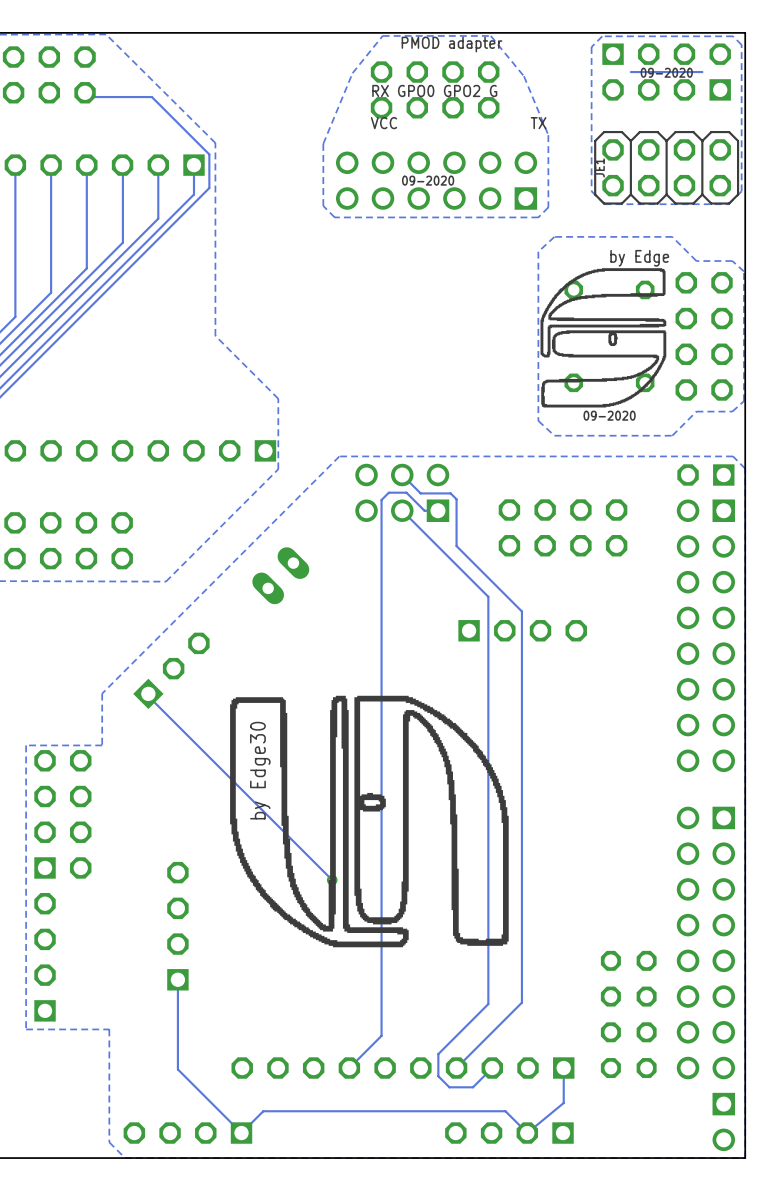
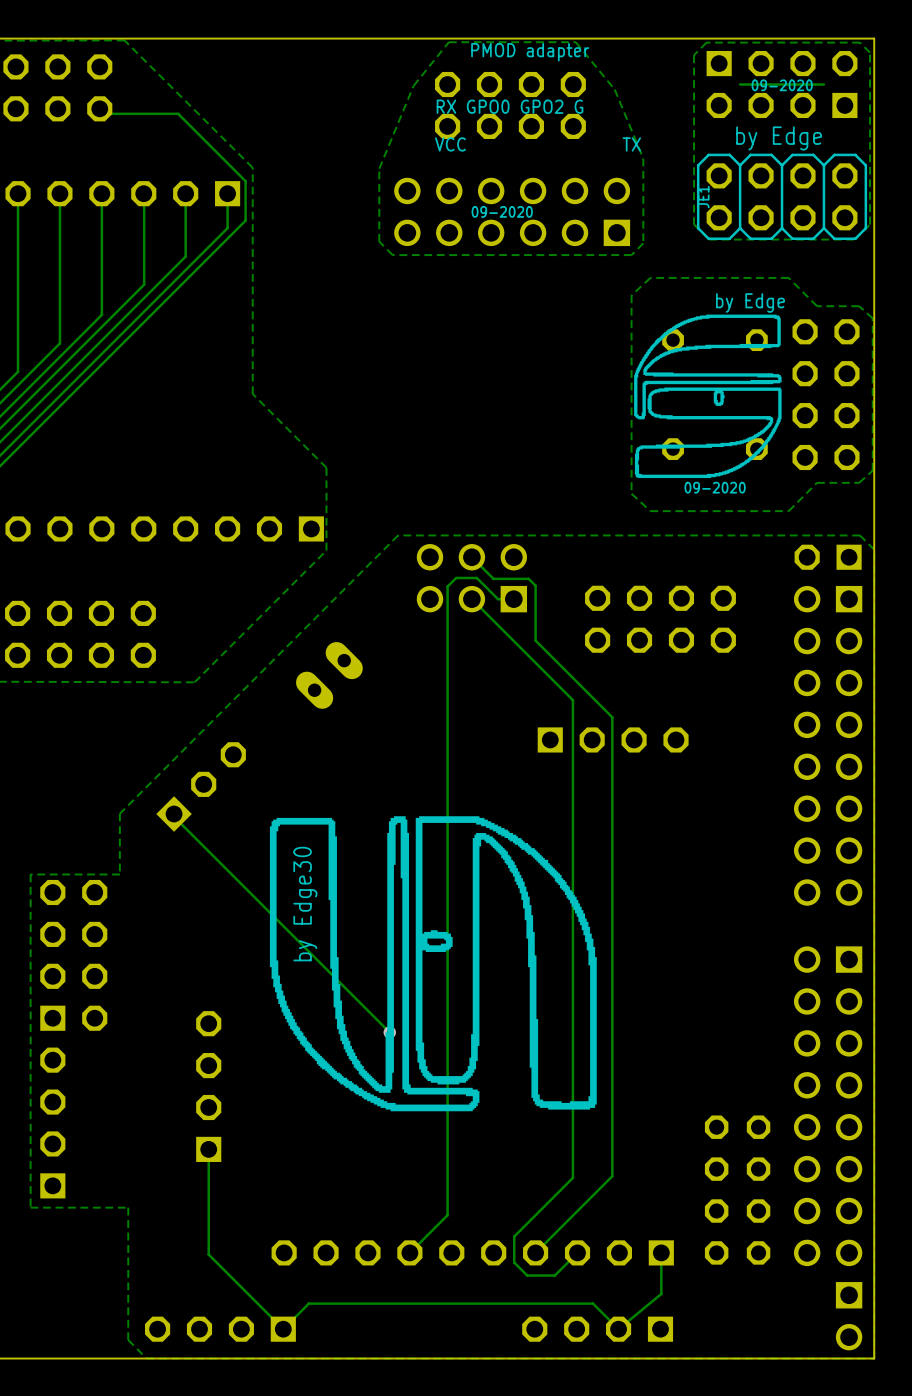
text: none -> by Edge (779, 138)

